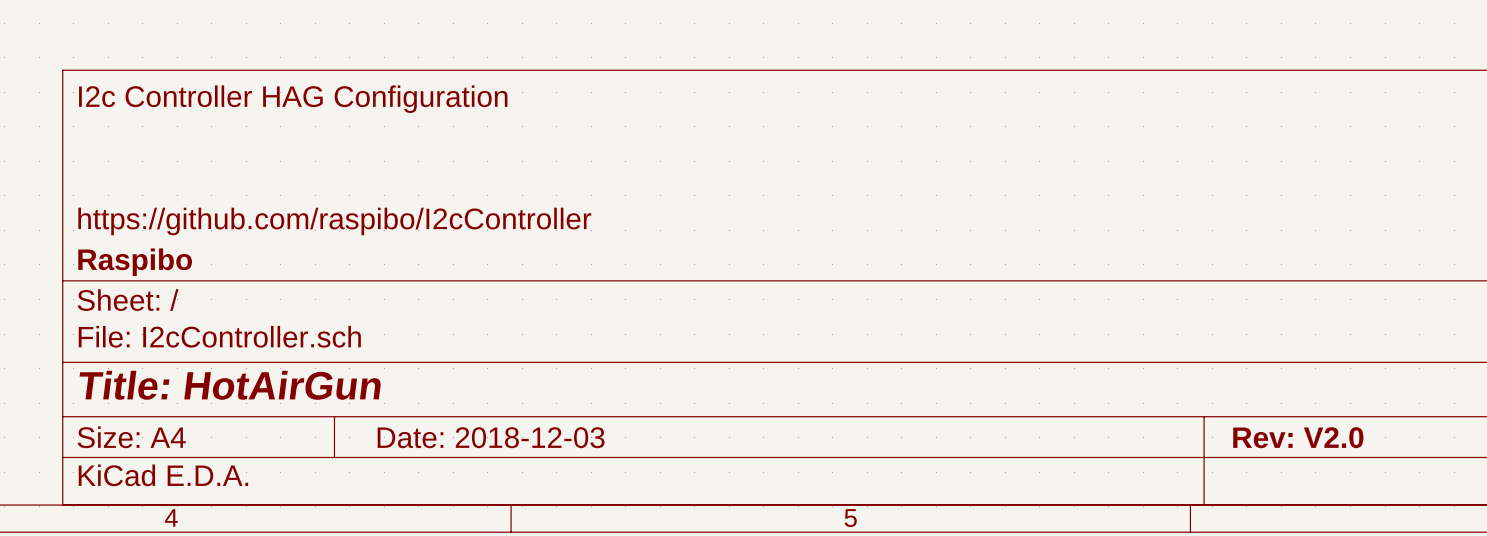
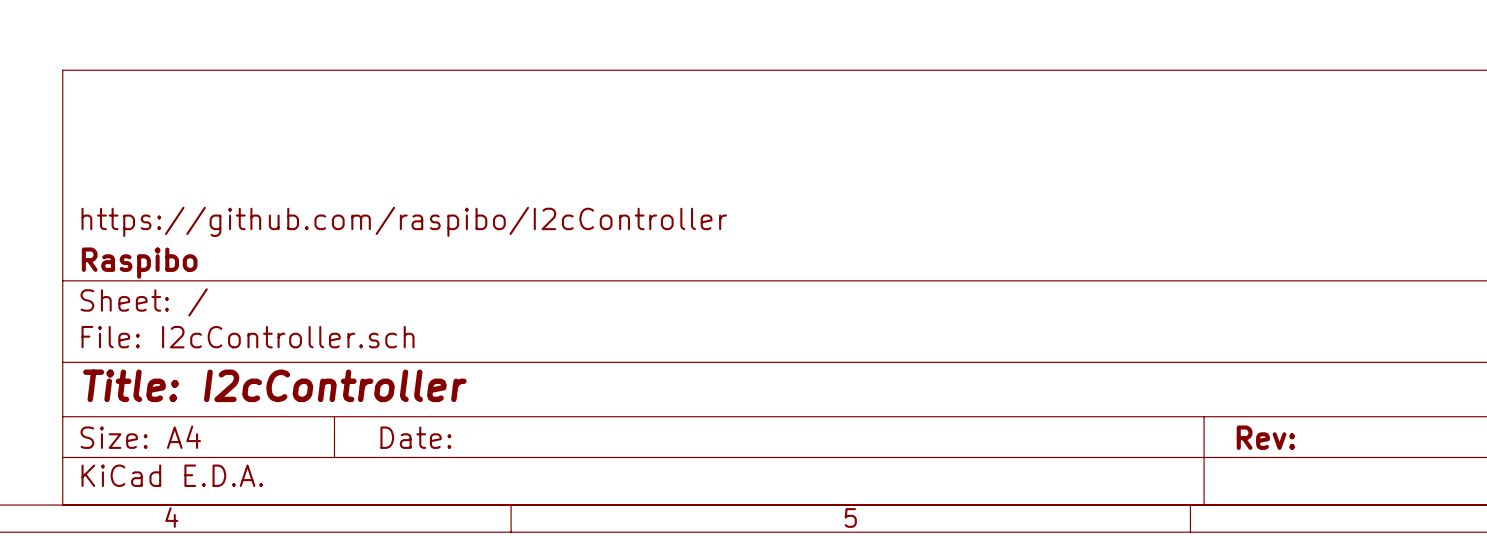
title block: I2c Controller HAG Configuration (293, 99) -> none
title block: Title: HotAirGun (230, 385) -> Title: I2cController (274, 385)
title block: Date: 2018-12-03 (491, 437) -> Date: (415, 437)
title block: Rev: V2.0 (1298, 437) -> Rev: (1265, 437)

